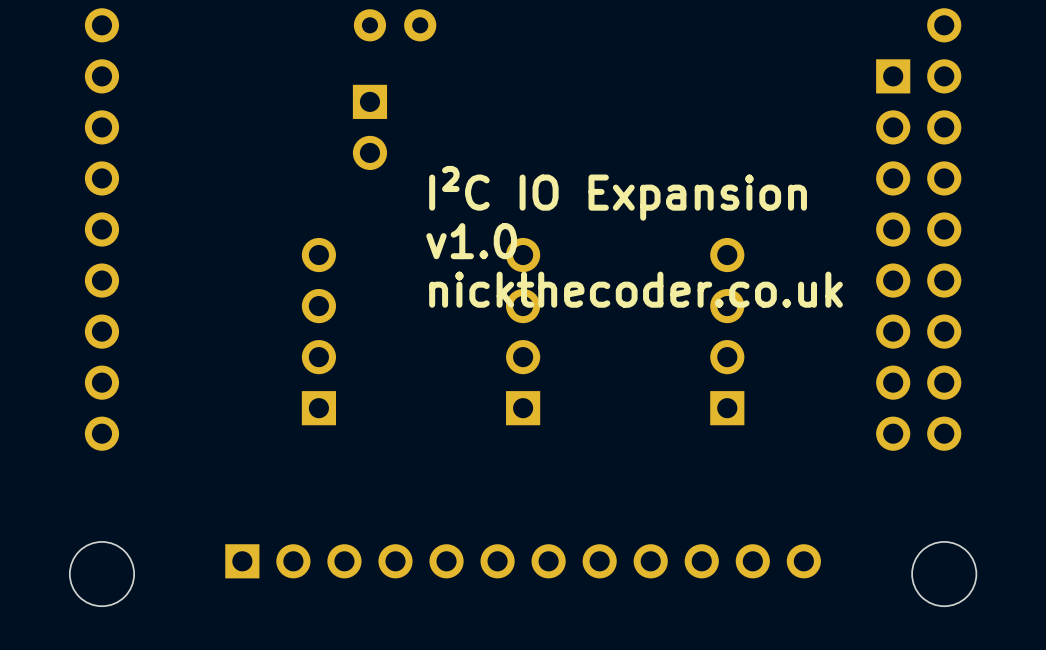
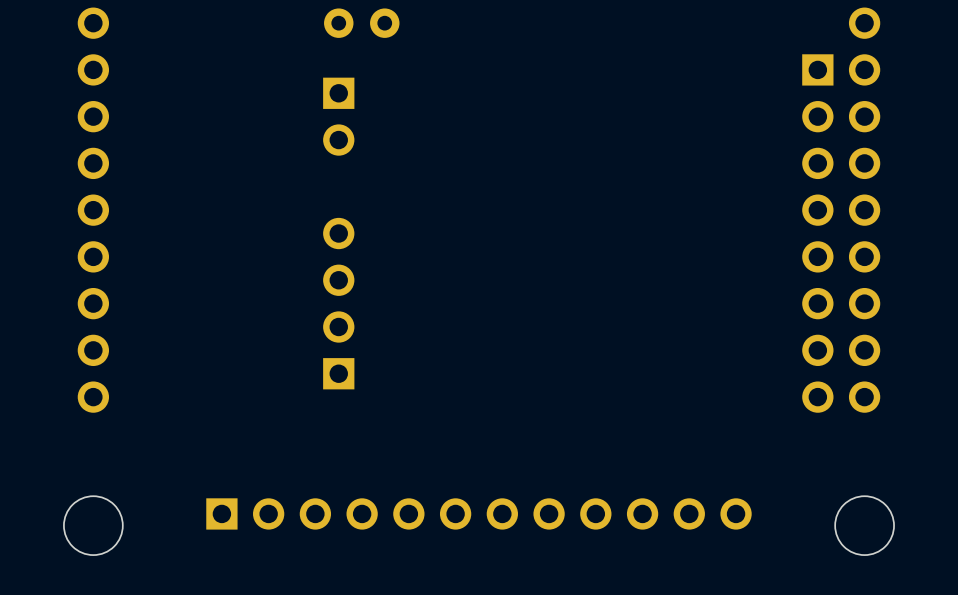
text: I²C IO Expansion (618, 193) -> none
text: v1.0 (471, 241) -> none
text: nickthecoder.co.uk (636, 289) -> none
part position: (318, 331) -> (338, 303)
part: (523, 331) -> none
part: (727, 331) -> none

